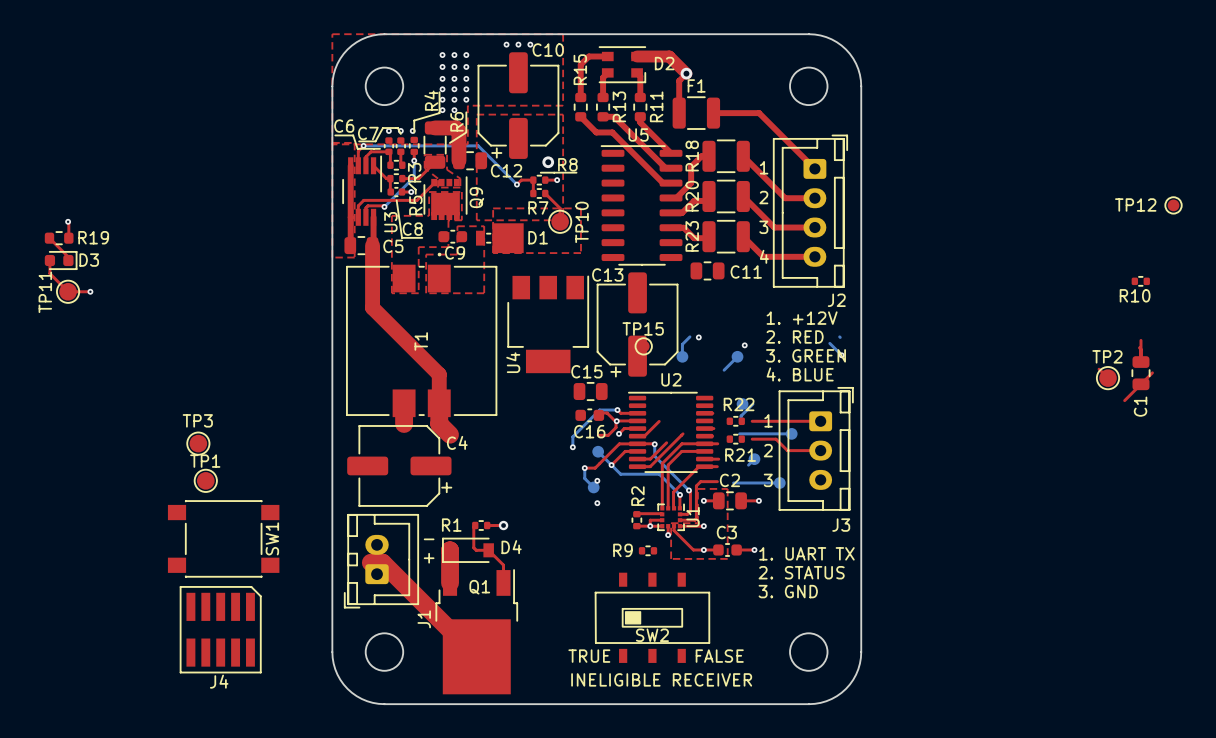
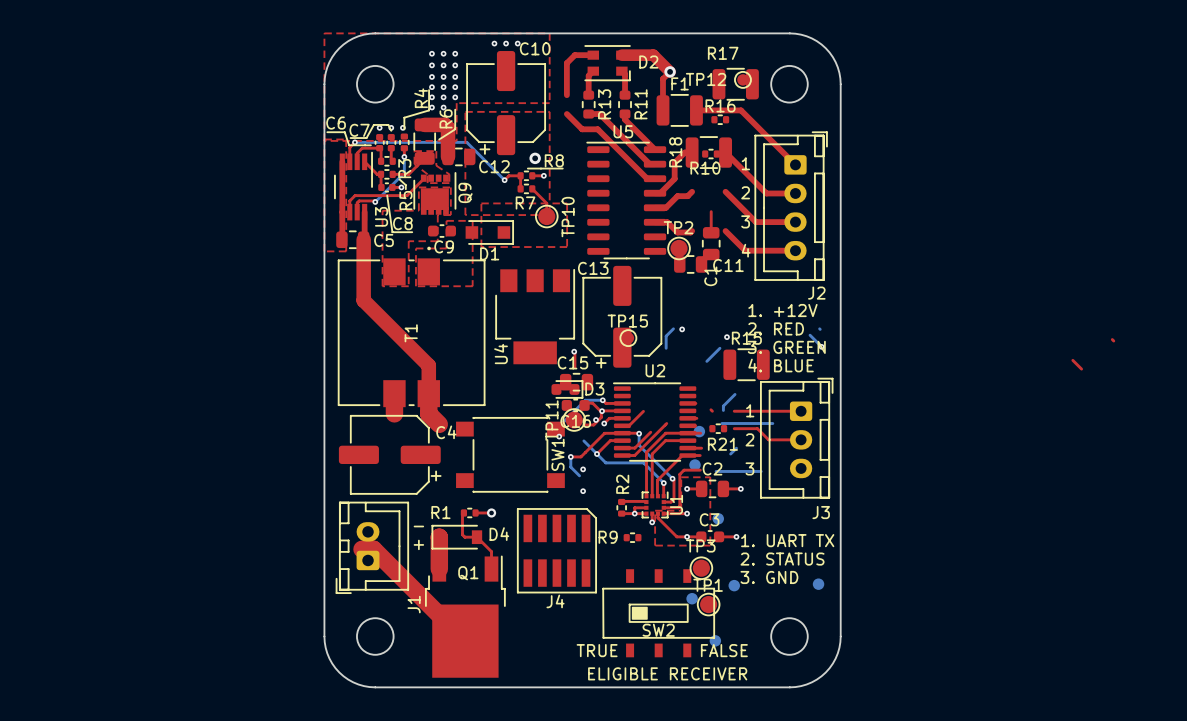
R17: none -> (735, 84)
R15 footprint: [573, 92, 588, 122] -> [723, 348, 770, 381]
R16: none -> (720, 119)
R20: (726, 196) -> none
TP12 position: (1173, 205) -> (742, 79)
top track: none -> (711, 211) (711, 232)
top track: (68, 221) (68, 238) -> none
via: (68, 221) -> none
D1 footprint: [476, 223, 524, 254] -> [465, 220, 514, 245]
R23: (726, 236) -> none
D1 name position: D1 (538, 237) -> D1 (489, 253)
top track: (49, 238) (68, 257) (68, 260) -> none
R19: (59, 238) -> none
top track: (49, 260) (49, 273) (68, 291) (90, 291) -> none
D3 position: (61, 260) -> (567, 389)
R10 position: (1140, 281) -> (711, 154)
TP11 position: (68, 291) -> (574, 419)
via: (90, 291) -> none
top track: (1140, 340) (1140, 362) -> none
part: (682, 356) -> none
part: (737, 356) -> none
top track: none -> (574, 351) (574, 367)
via: none -> (574, 351)
top track: (1152, 372) (1124, 400) -> none
C1 position: (1140, 373) -> (711, 243)
TP2 position: (1108, 378) -> (679, 248)
part: (742, 404) -> none
R22: (735, 421) -> none
via: none -> (596, 419)
part: (791, 433) -> none
part: none -> (699, 431)
TP3 position: (198, 443) -> (701, 568)
part: (598, 451) -> none
part: (754, 459) -> none
part: none -> (695, 465)
TP1 position: (205, 480) -> (708, 604)
part: (779, 482) -> none
part: (593, 487) -> none
part: none -> (718, 518)
SW1 position: (223, 538) -> (510, 454)
part: none -> (818, 584)
part: none -> (734, 585)
part: none -> (692, 598)
SW2 position: (652, 617) -> (658, 613)
J4 position: (220, 629) -> (556, 550)
text position: TRUE (589, 656) -> TRUE (597, 650)
text position: FALSE (719, 656) -> FALSE (724, 650)
part: none -> (715, 640)
text: INELIGIBLE RECEIVER (661, 679) -> ELIGIBLE RECEIVER (667, 673)

